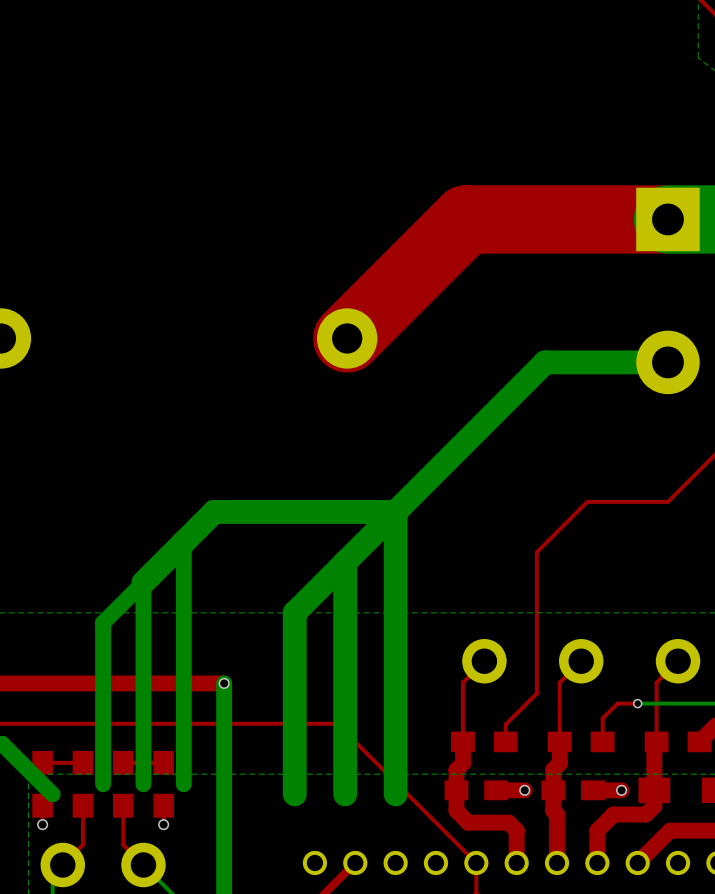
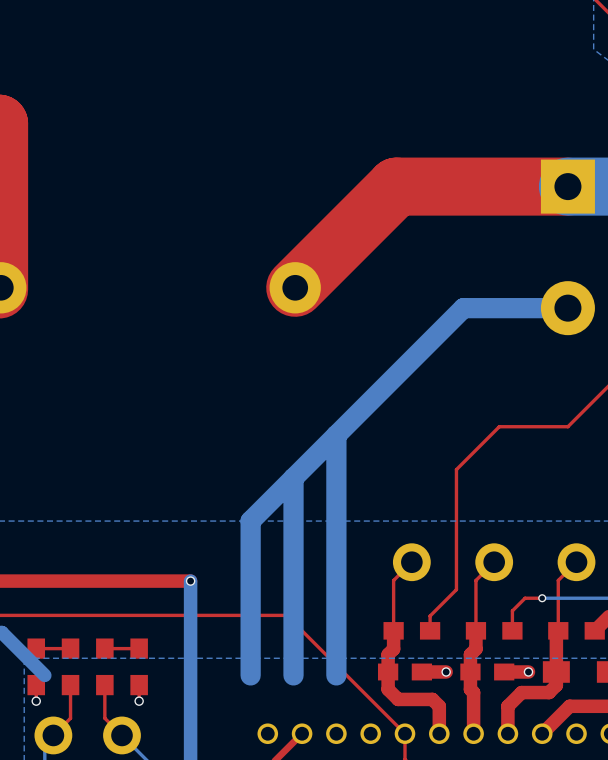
bottom track: (395, 511) (214, 511) (143, 582) -> none
bottom track: (183, 542) (183, 784) -> none
bottom track: (143, 582) (103, 622) (103, 784) -> none
bottom track: (143, 582) (143, 784) -> none

